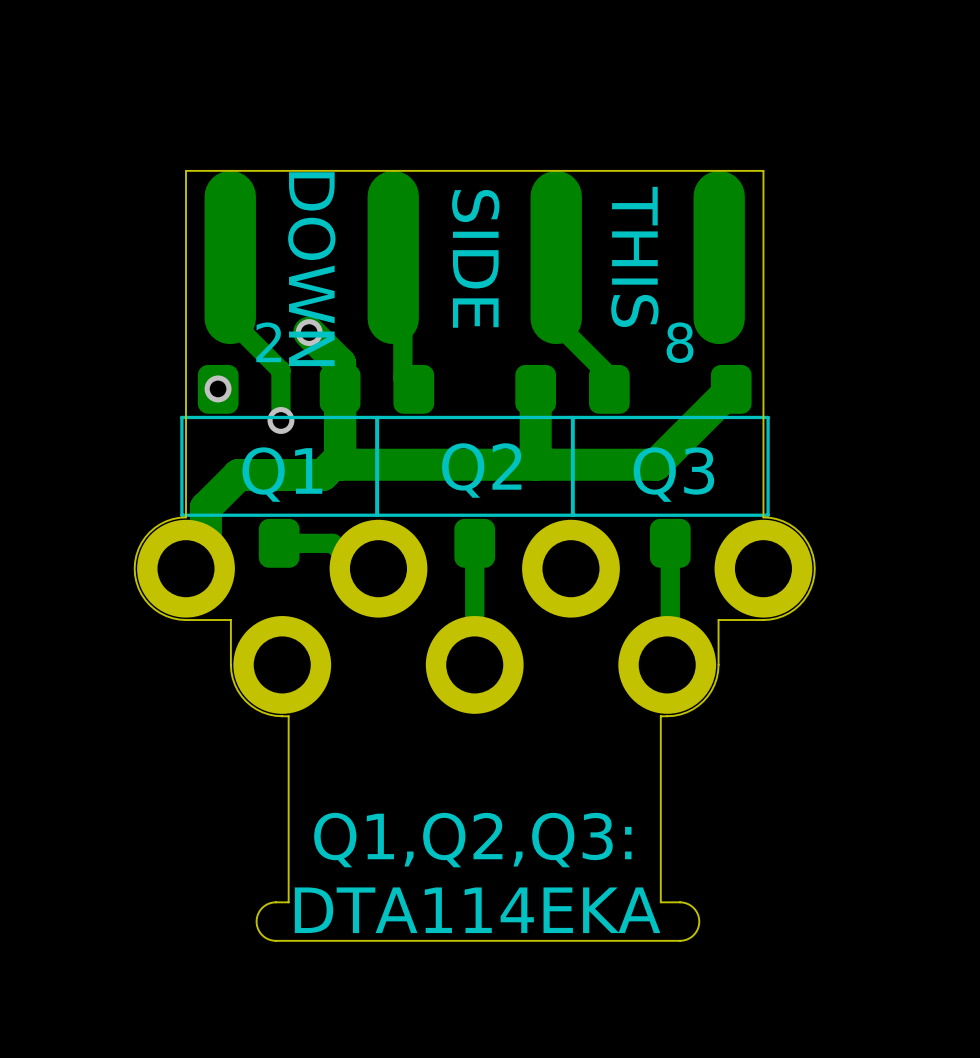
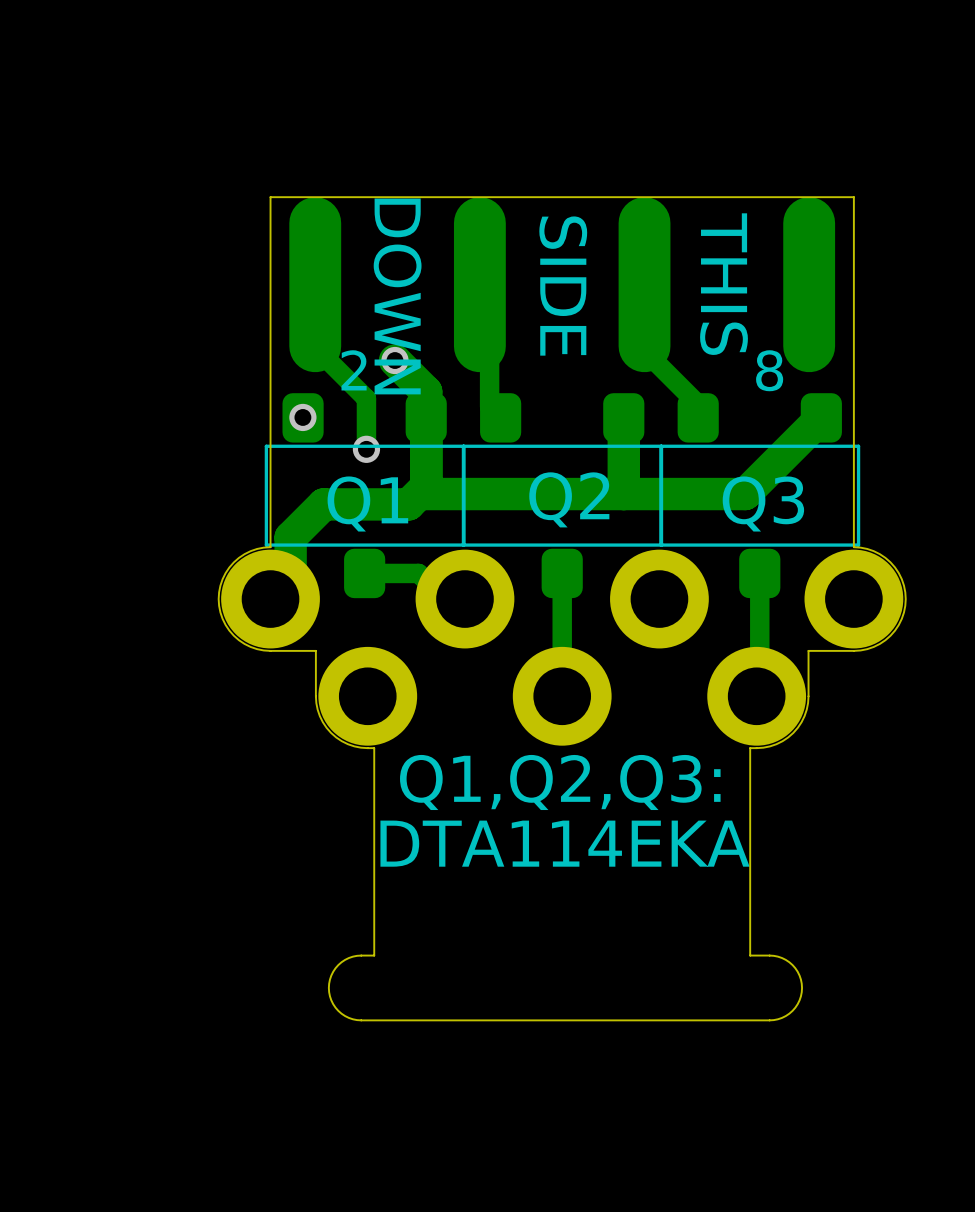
text position: Q1,Q2,Q3: (472, 840) -> Q1,Q2,Q3: (560, 782)
board edge: (660, 902) (682, 902) (693, 907) (699, 921) (693, 935) (680, 940) (275, 940) (266, 938) (257, 926) (259, 911) (270, 902) (288, 902) -> (750, 936) (750, 955) (773, 955) (782, 958) (792, 965) (799, 975) (802, 987) (799, 1000) (792, 1010) (782, 1017) (769, 1020) (352, 1019) (341, 1013) (333, 1004) (329, 992) (329, 979) (335, 968) (345, 959) (357, 955) (374, 955) (374, 936)
text position: DTA114EKA (477, 910) -> DTA114EKA (565, 843)

